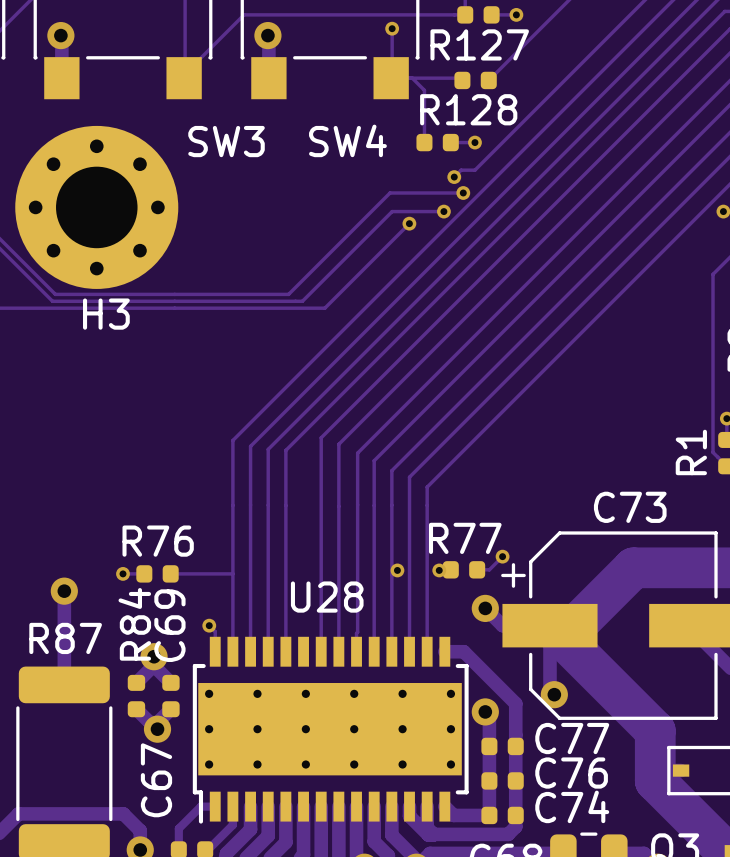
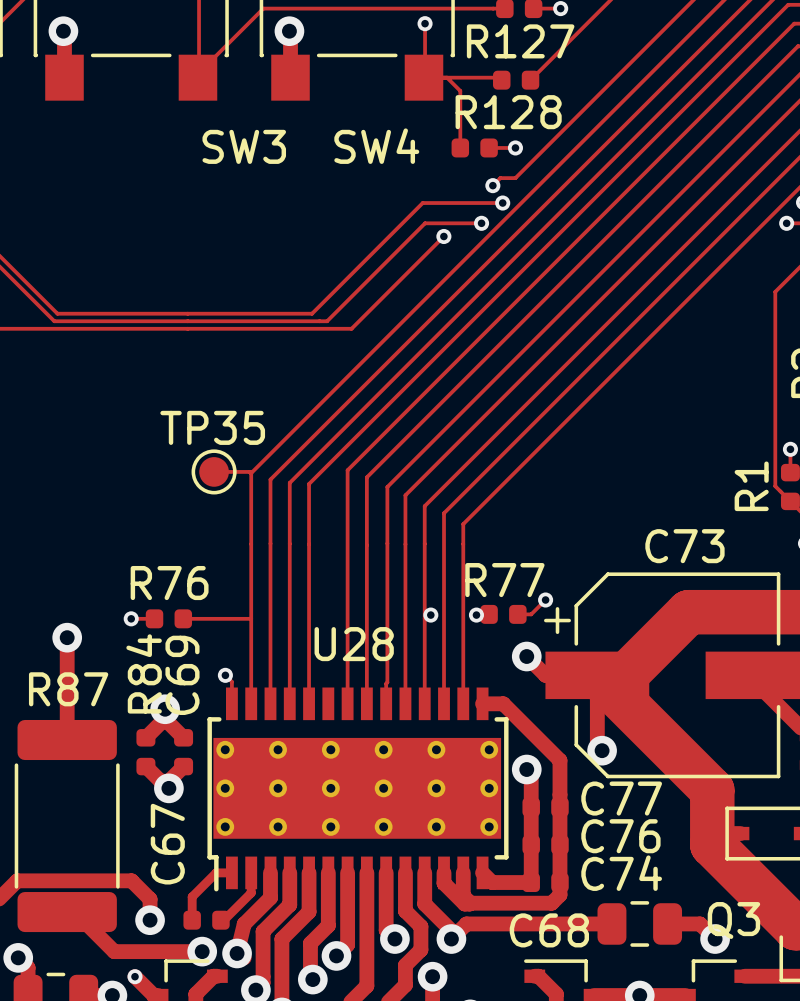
H3: (96, 207) -> none
track: none -> (214, 471) (251, 473)
TP35: none -> (214, 471)

